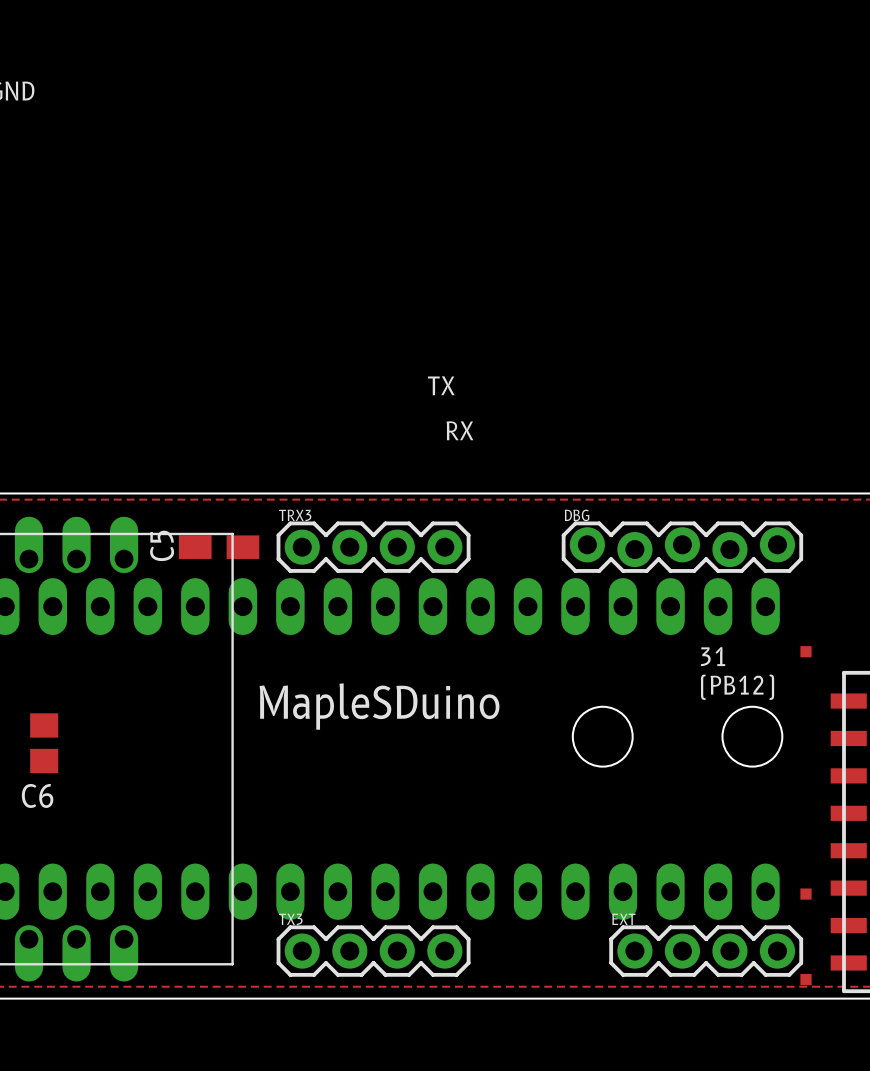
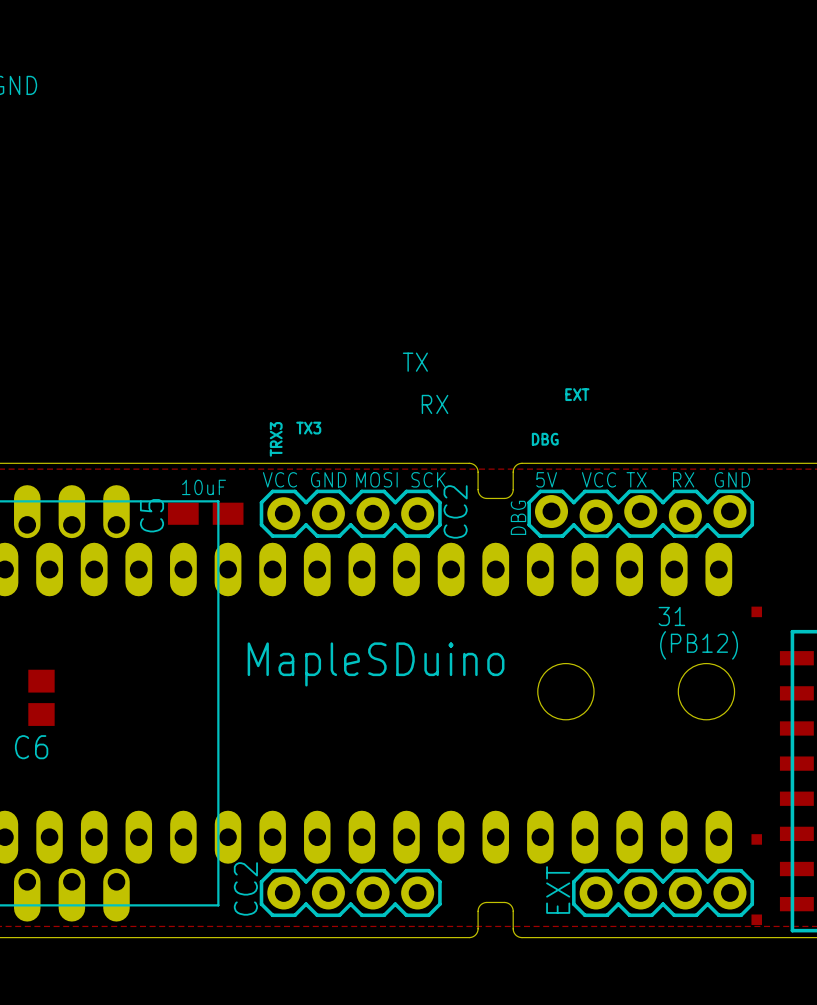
board edge: (499, 493) (555, 493) -> (469, 463) (476, 467) (478, 491) (481, 496) (486, 498) (505, 498) (510, 495) (513, 490) (513, 468) (521, 463)
text: none -> VCC (279, 479)
text: none -> GND (328, 479)
text: none -> MOSI (376, 479)
text: none -> SCK (428, 479)
text: none -> 5V (546, 479)
text: none -> VCC (598, 479)
text: none -> TX (636, 479)
text: none -> RX (683, 479)
text: none -> GND (732, 479)
TRX3 name rotation: 0° (295, 515) -> 90° counterclockwise (276, 439)
TRX3 name position: TRX3 (295, 515) -> TRX3 (276, 439)
DBG name position: DBG (577, 515) -> DBG (545, 439)
text: none -> 10uF (204, 487)
text: none -> DBG (518, 517)
text: none -> CC2 (455, 511)
TX3 name position: TX3 (290, 919) -> TX3 (308, 428)
EXT name position: EXT (623, 919) -> EXT (577, 394)
text: none -> EXT (558, 890)
text: none -> CC2 (245, 888)
board edge: (499, 998) (555, 998) -> (469, 937) (476, 933) (478, 908) (481, 904) (486, 902) (505, 902) (510, 905) (513, 910) (513, 932) (521, 937)

